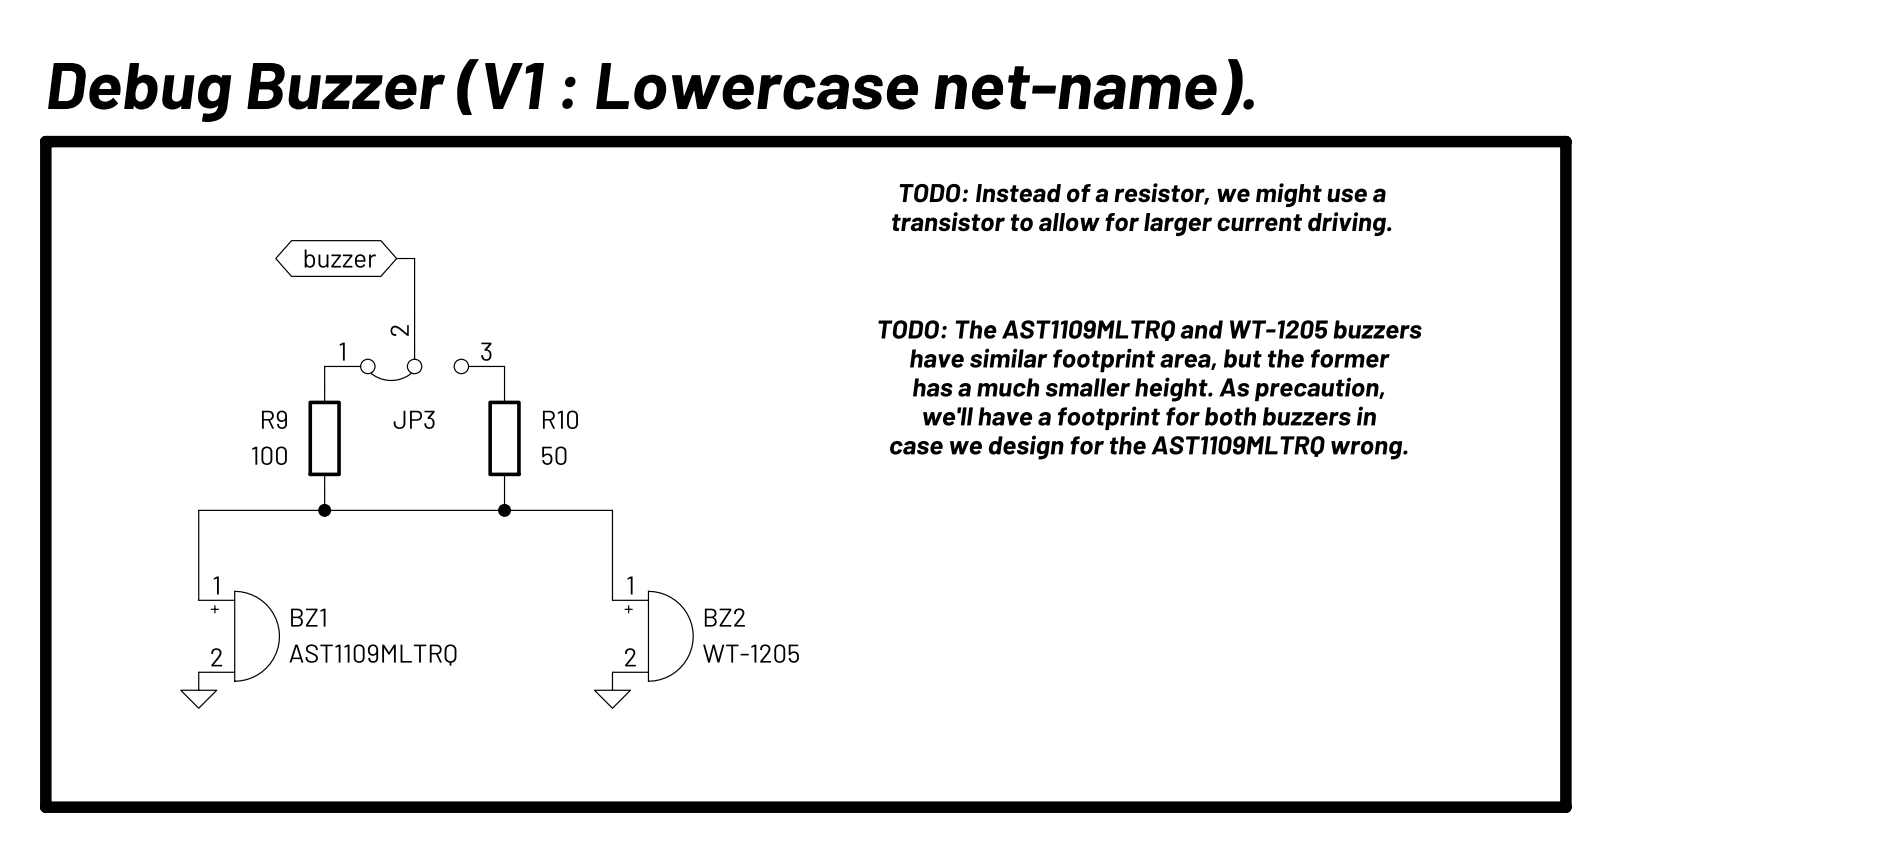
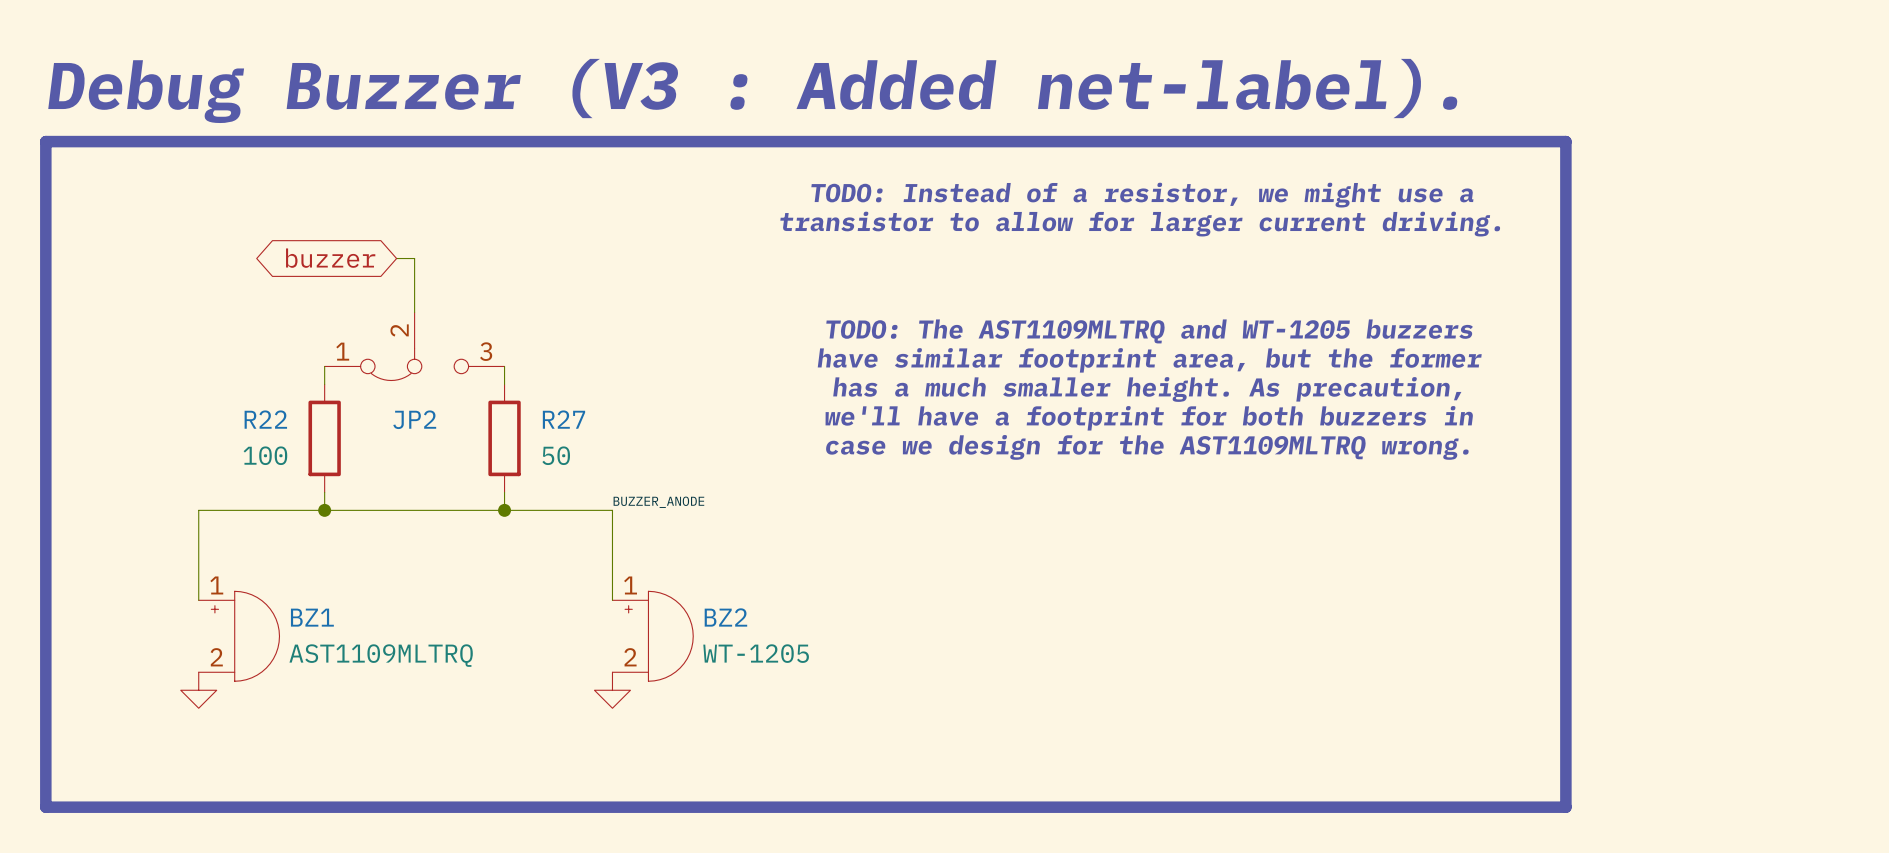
text: Debug Buzzer (V1 : Lowercase net-name). (651, 90) -> Debug Buzzer (V3 : Added net-label). (752, 90)
R9 name: R9 (274, 419) -> R22 (265, 419)
JP3 name: JP3 (414, 419) -> JP2 (414, 419)
R10 name: R10 (560, 419) -> R27 (563, 419)
label: none -> BUZZER_ANODE (658, 502)

